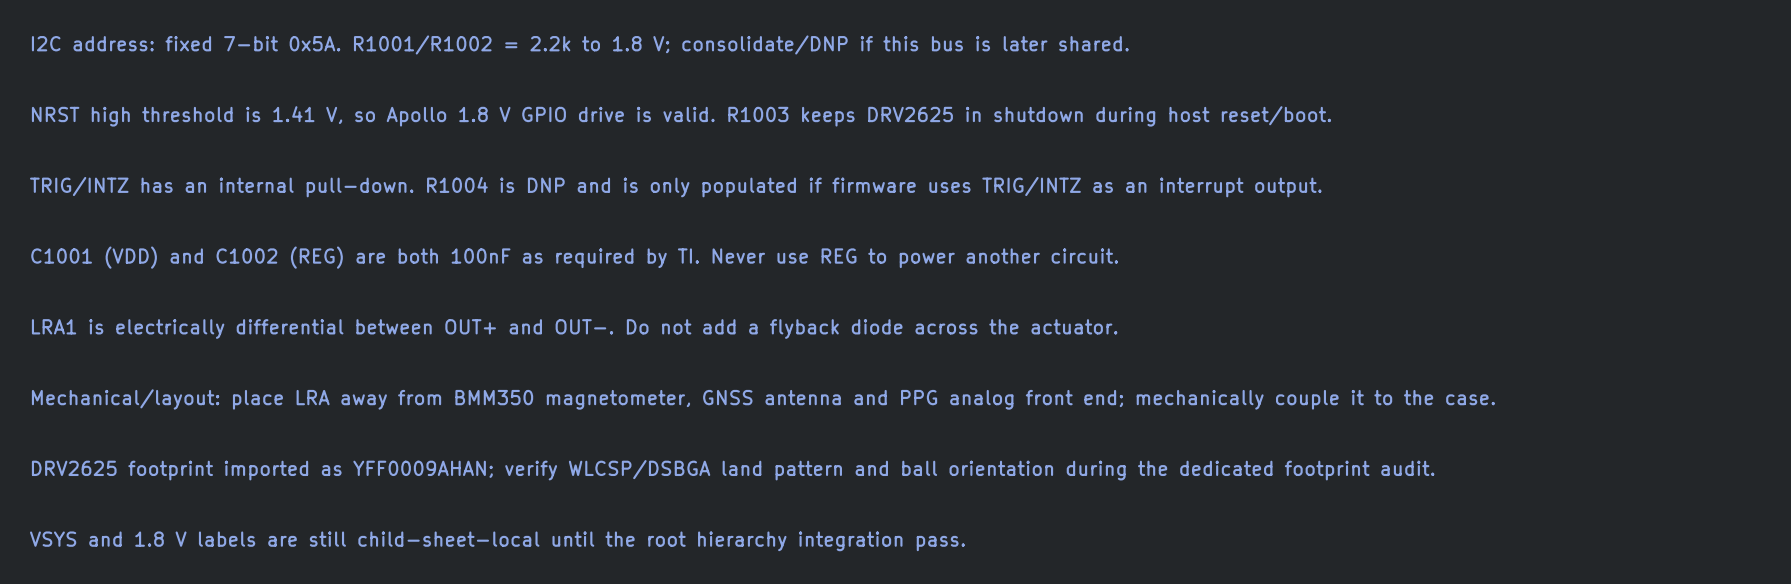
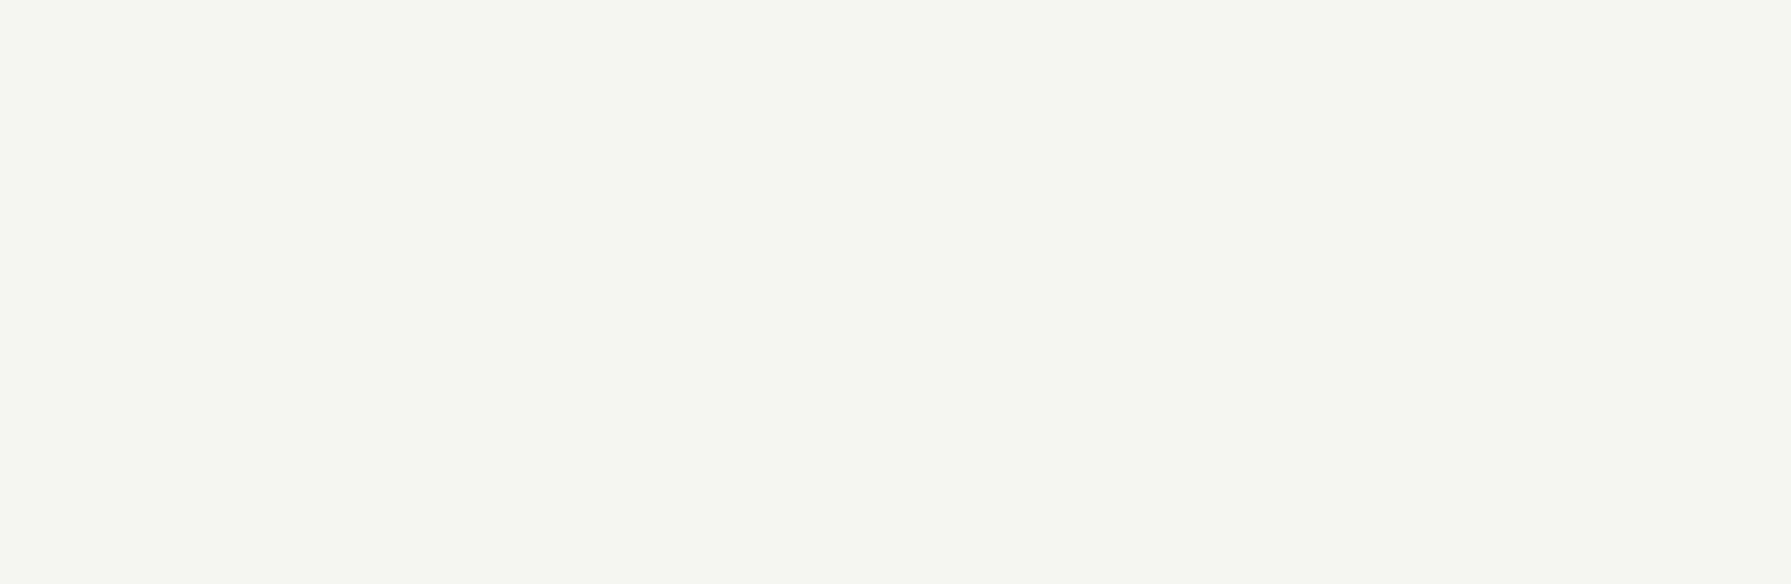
text: I2C address: fixed 7-bit 0x5A. R1001/R1002 = 2.2k to 1.8 V; consolidate/DNP if this bus is later shared. (580, 44) -> none
text: NRST high threshold is 1.41 V, so Apollo 1.8 V GPIO drive is valid. R1003 keeps DRV2625 in shutdown during host reset/boot. (681, 116) -> none
text: TRIG/INTZ has an internal pull-down. R1004 is DNP and is only populated if firmware uses TRIG/INTZ as an interrupt output. (675, 187) -> none
text: C1001 (VDD) and C1002 (REG) are both 100nF as required by TI. Never use REG to power another circuit. (574, 257) -> none
text: LRA1 is electrically differential between OUT+ and OUT-. Do not add a flyback diode across the actuator. (574, 329) -> none
text: Mechanical/layout: place LRA away from BMM350 magnetometer, GNSS antenna and PPG analog front end; mechanically couple it to the case. (763, 399) -> none
text: DRV2625 footprint imported as YFF0009AHAN; verify WLCSP/DSBGA land pattern and ball orientation during the dedicated footprint audit. (733, 470) -> none
text: VSYS and 1.8 V labels are still child-sheet-local until the root hierarchy integration pass. (497, 541) -> none

